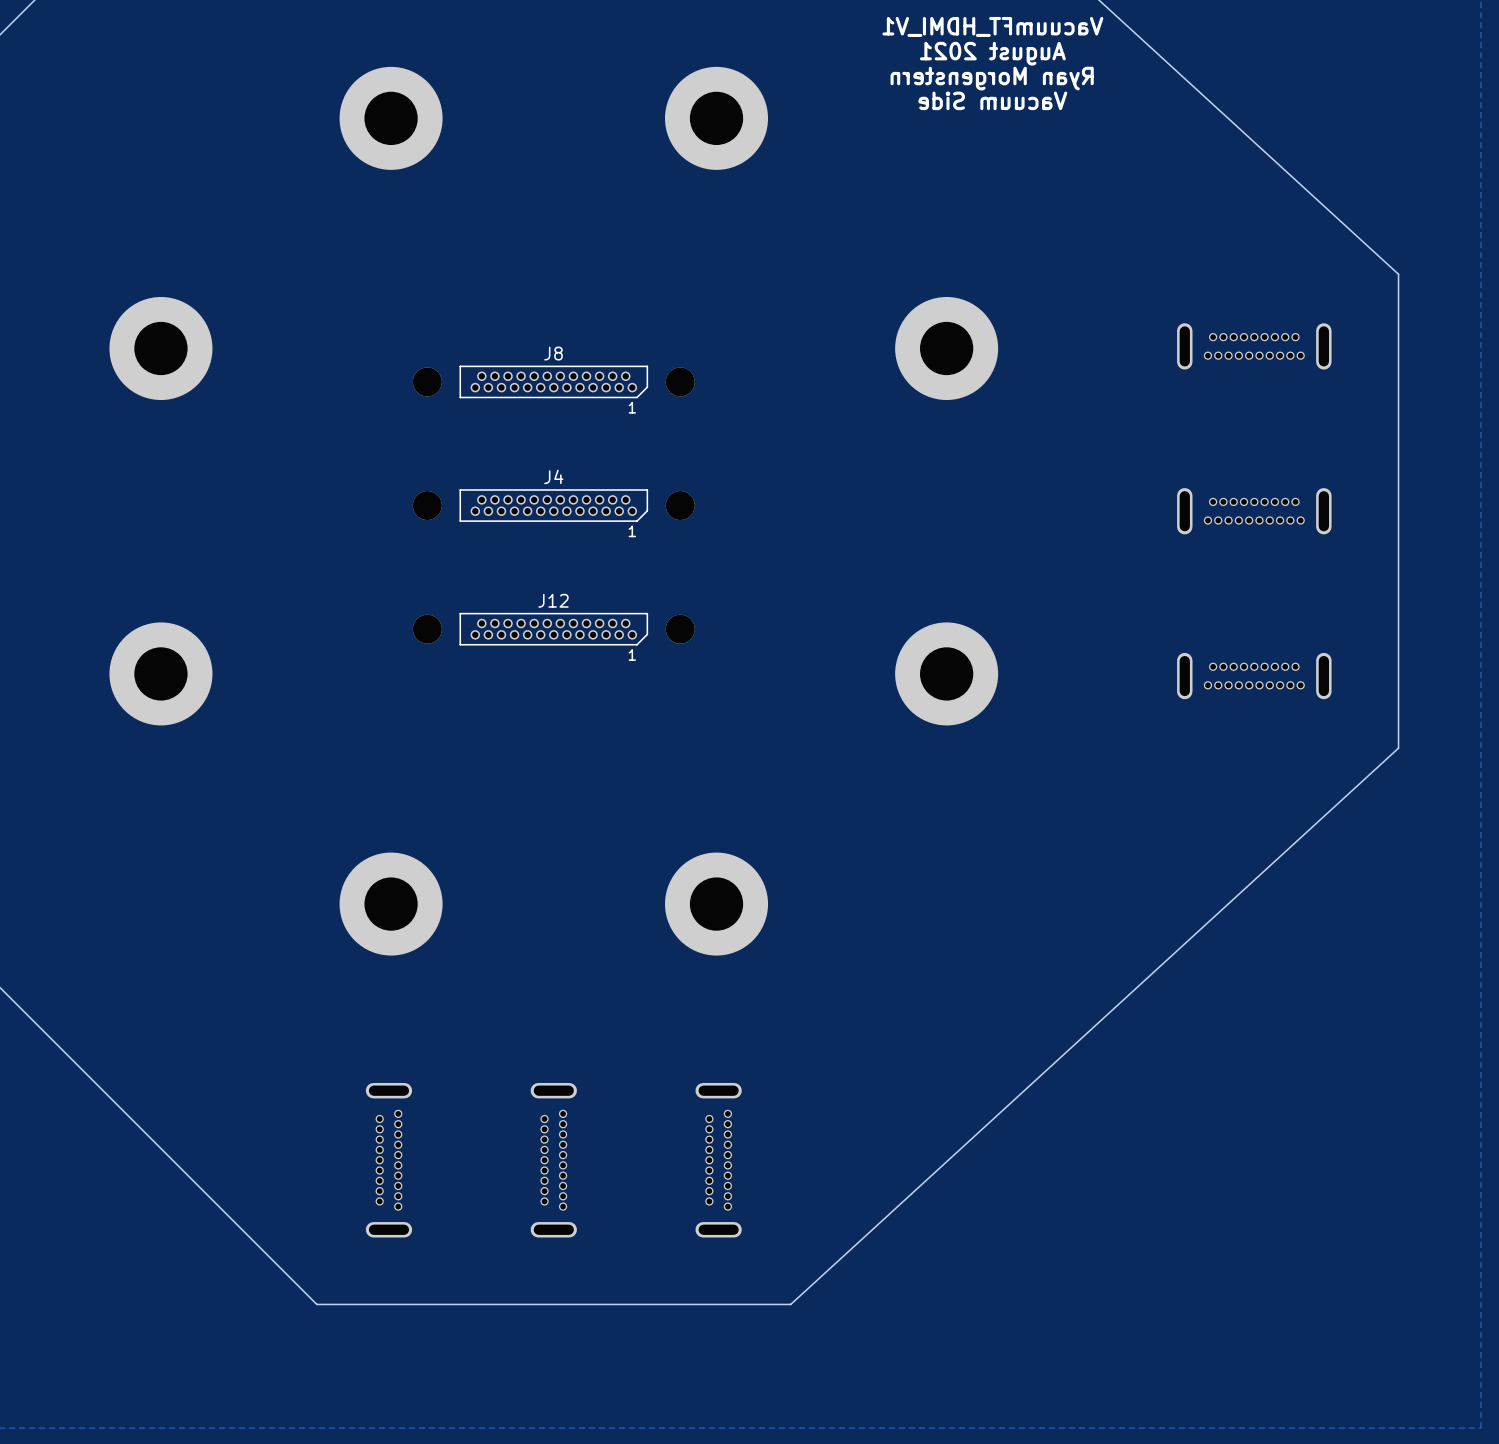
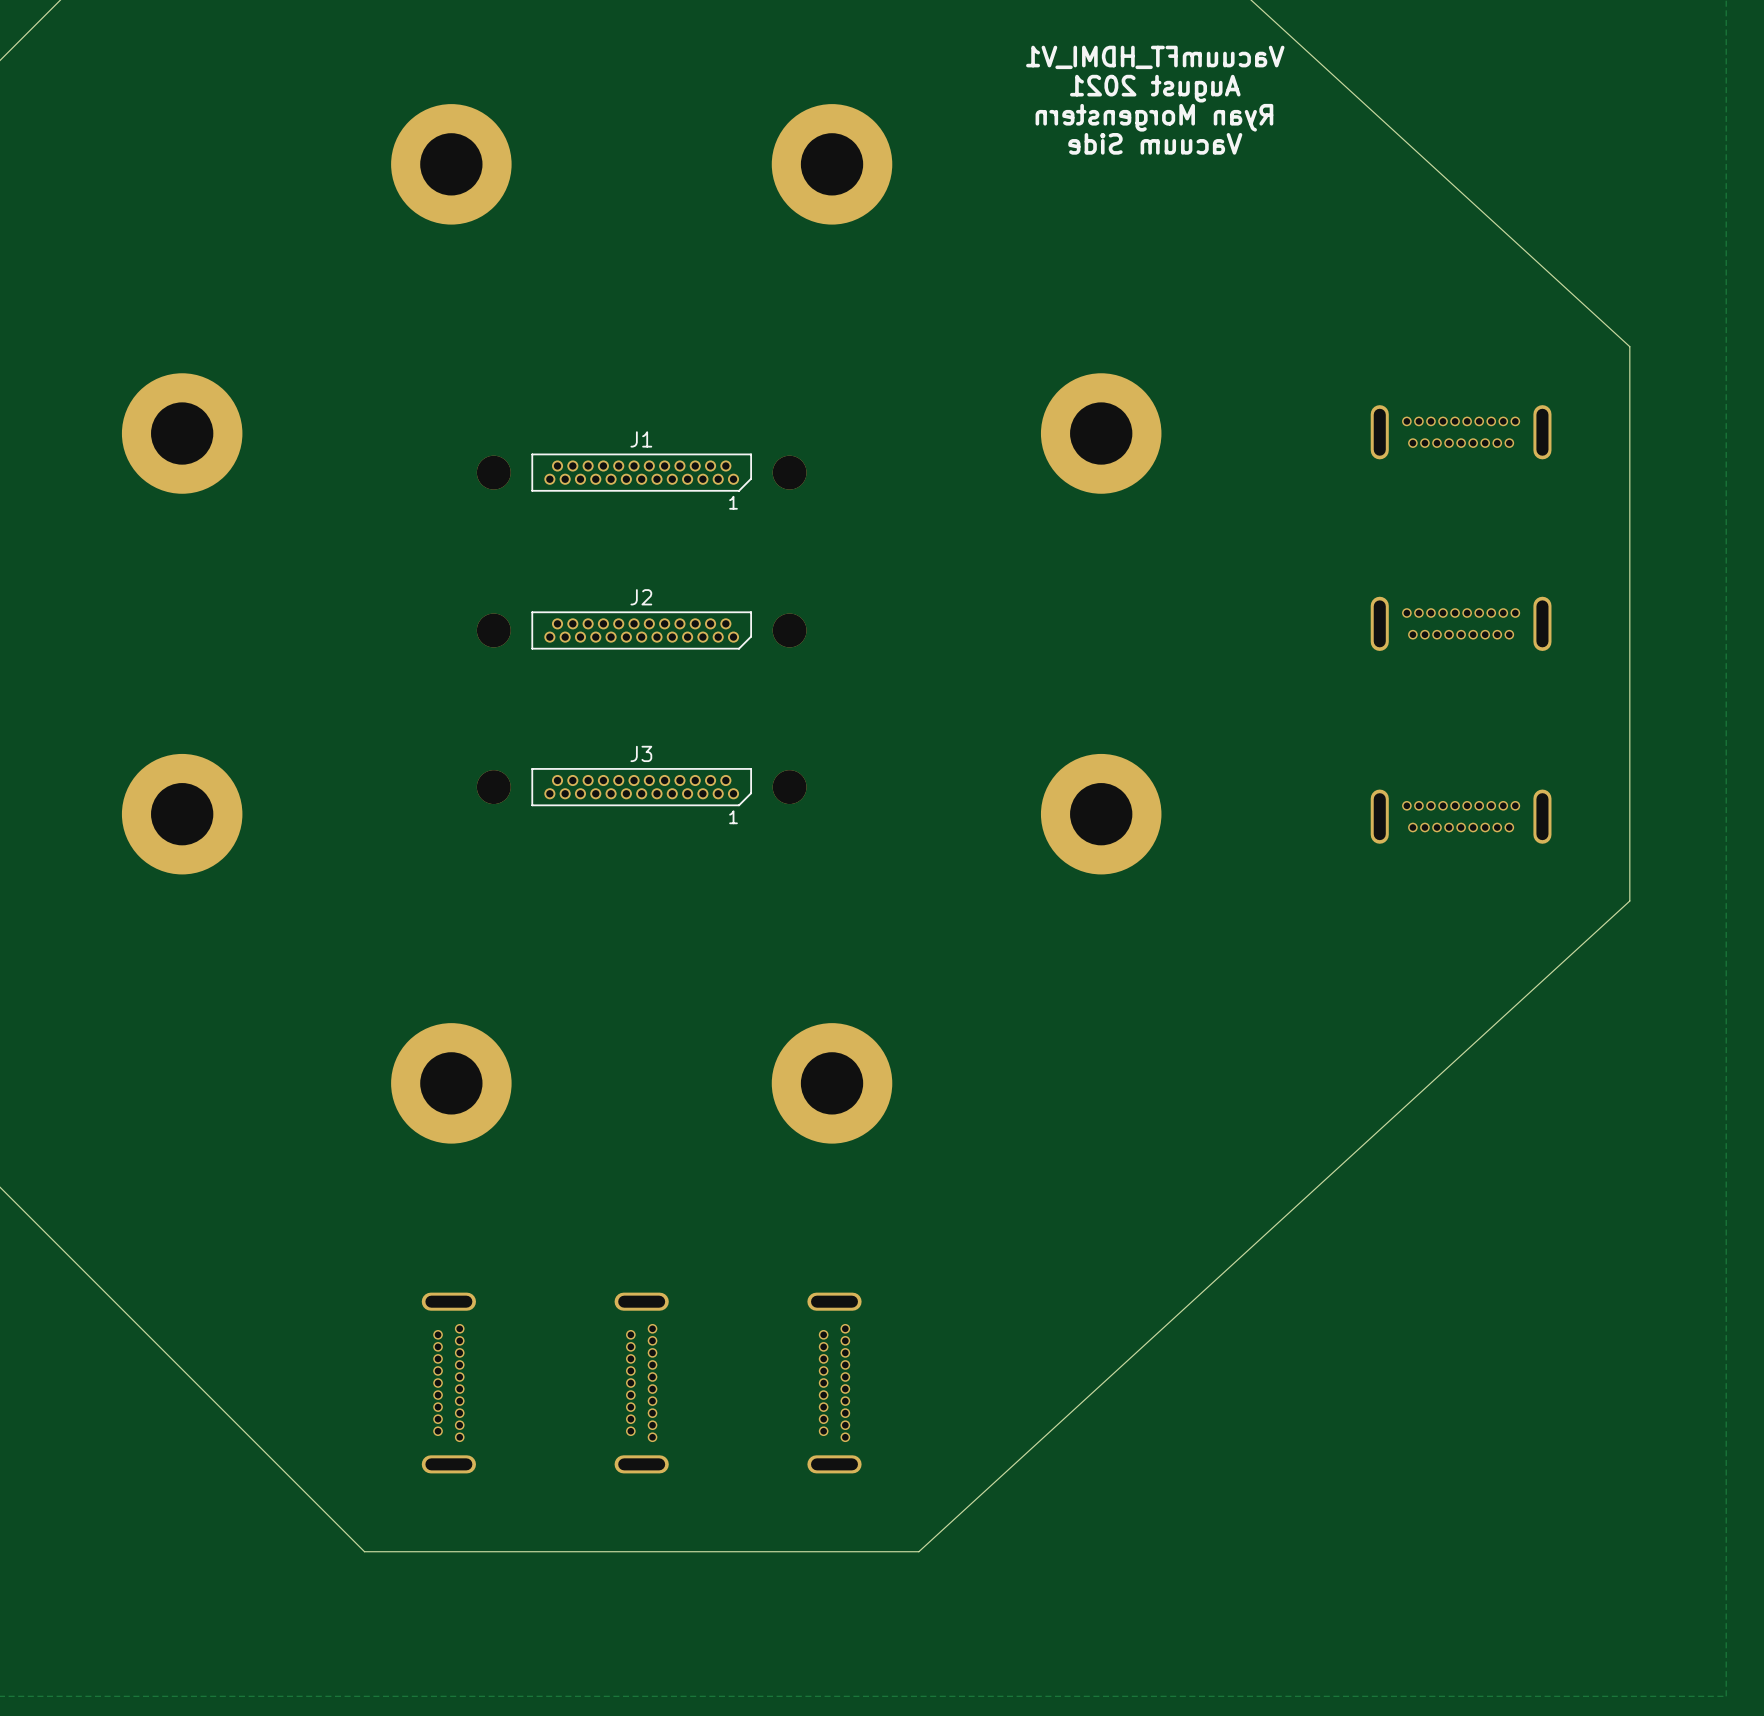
part rotation: 0° (1254, 346) -> 180° (1461, 432)
J8 name: J8 (553, 353) -> J1 (641, 439)
J4: (553, 505) -> none
part rotation: 0° (1254, 511) -> 180° (1461, 623)
J2: none -> (641, 630)
J12: (553, 629) -> none
J3: none -> (641, 787)
part rotation: 0° (1254, 676) -> 180° (1461, 816)

